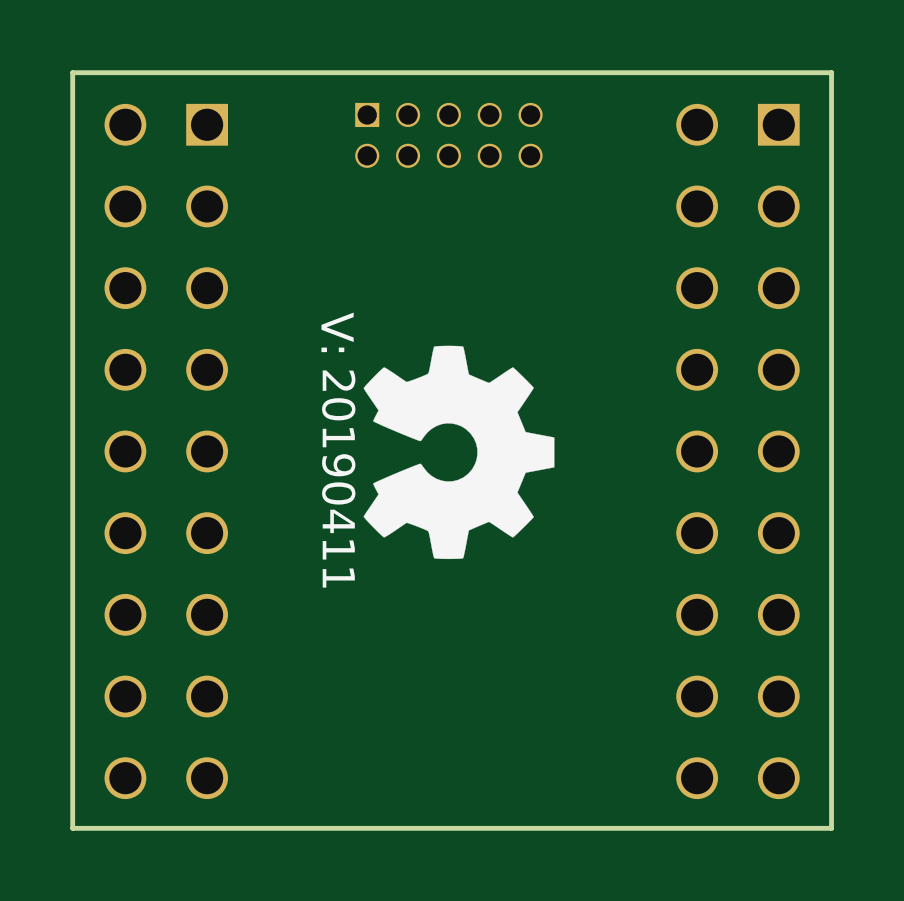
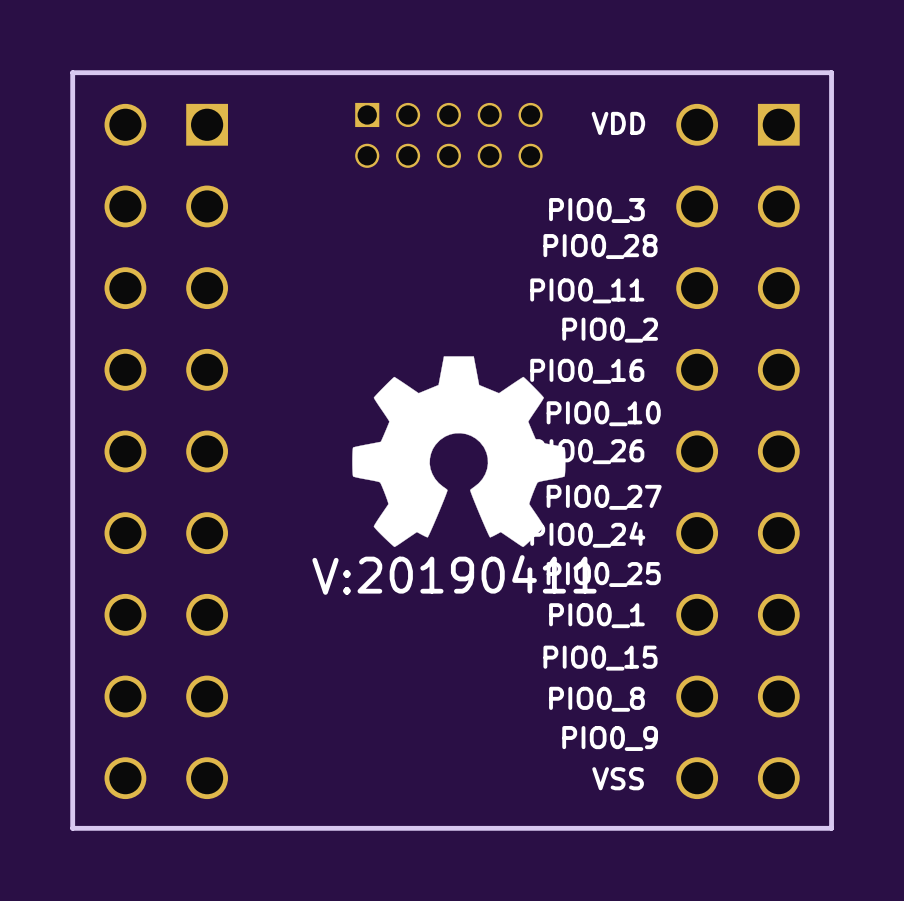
part footprint: [676, 103, 800, 800] -> [676, 103, 800, 800]
drawing: [321, 312, 356, 588] -> none
drawing shape: [363, 345, 555, 560] -> [352, 356, 566, 548]
drawing: none -> [312, 555, 597, 595]

